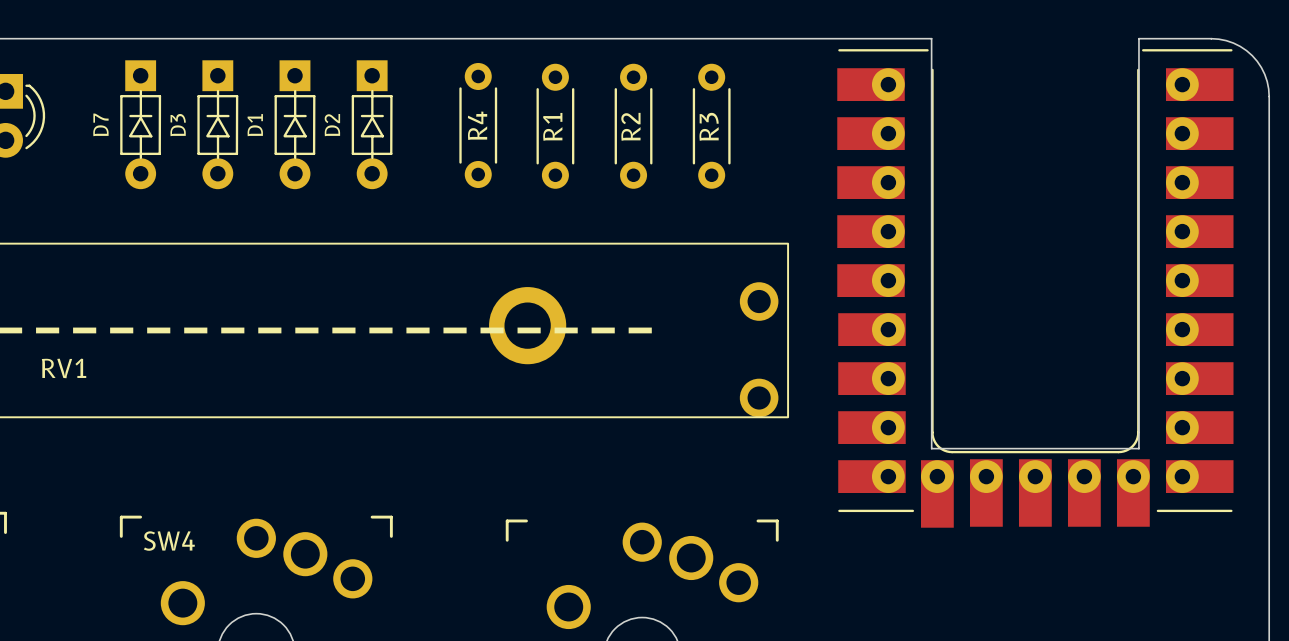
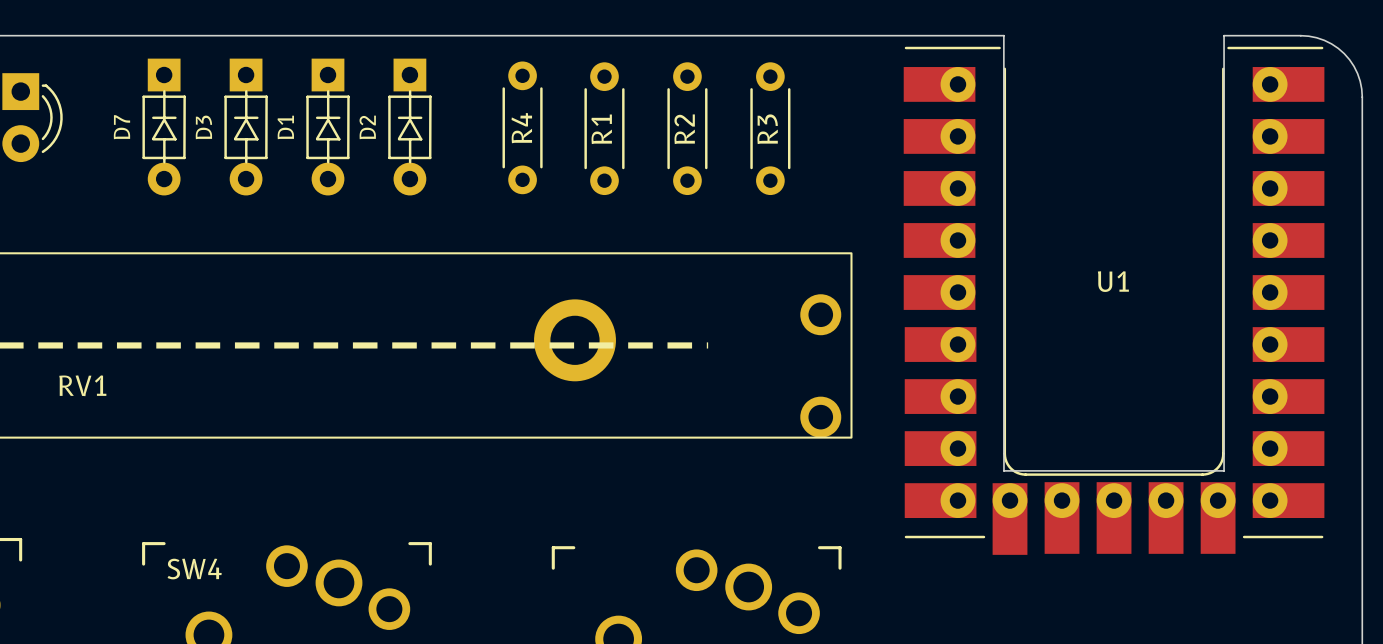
U1 name: none -> U1 (1113, 281)

